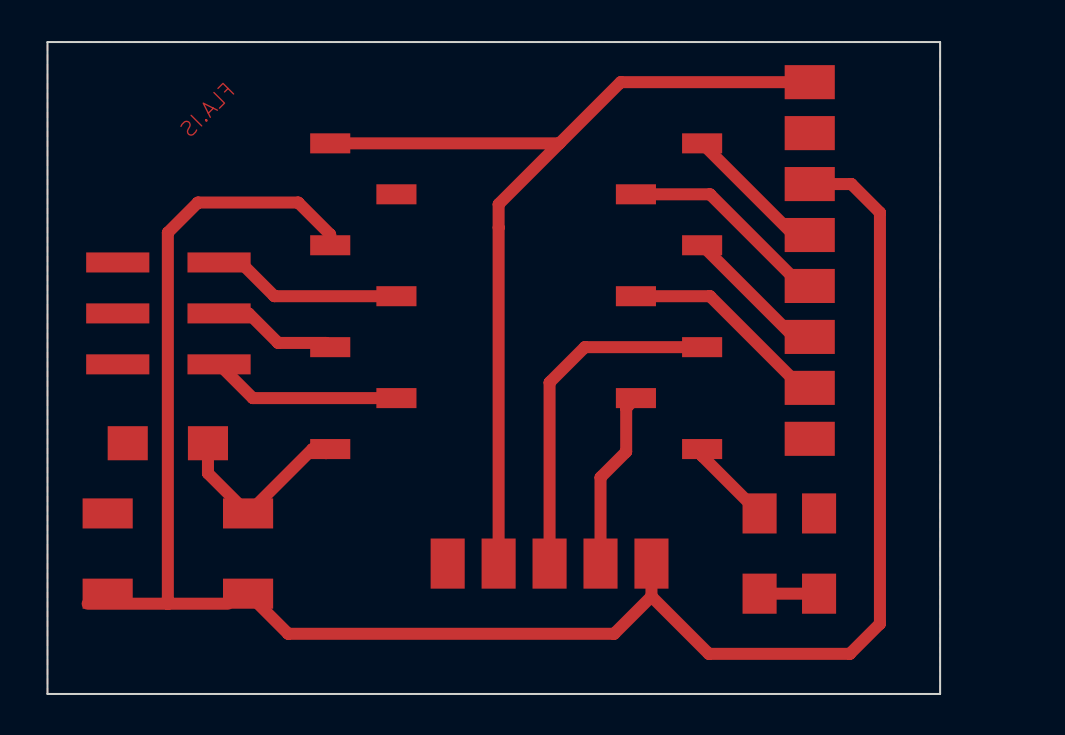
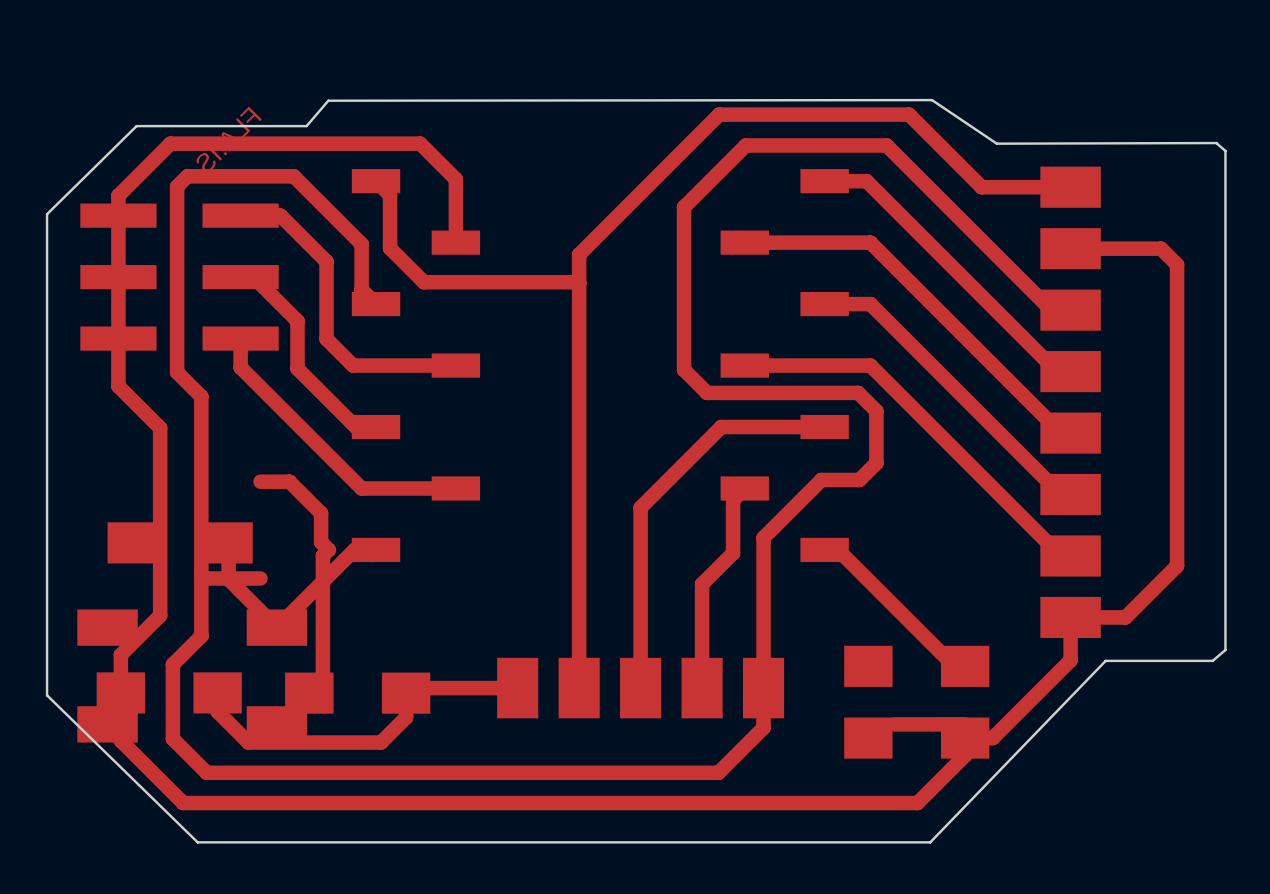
board edge: (940, 42) (47, 42) (47, 693) (940, 693) (940, 42) -> (932, 100) (996, 143) (1216, 143) (1225, 151) (1225, 649) (1212, 660) (1105, 660) (930, 842) (197, 842) (47, 695) (47, 214) (136, 126) (306, 126) (328, 100) (932, 100)
top track: (809, 82) (620, 82) (614, 88) -> (1070, 187) (981, 187) (909, 114) (719, 114)
top track: (559, 143) (330, 143) -> (579, 282) (423, 282) (390, 248) (390, 195) (376, 181)
top track: (702, 143) (793, 235) (809, 235) -> (824, 181) (866, 181) (1057, 371) (1070, 371)
top track: (809, 184) (851, 184) (879, 212) (879, 623) (849, 653) (708, 653) (651, 596) -> none
top track: none -> (455, 242) (455, 179) (420, 143) (170, 143) (118, 195) (118, 386) (160, 427) (160, 615) (120, 654) (120, 740) (183, 803) (917, 803) (965, 755) (965, 738) (992, 738) (1070, 660) (1070, 617) (1125, 617) (1177, 565) (1177, 264) (1161, 248) (1070, 248)
top track: (710, 194) (801, 285) (809, 285) -> (834, 242) (870, 242) (1060, 433) (1070, 433)
top track: (330, 245) (330, 234) (298, 202) (197, 202) (167, 232) (167, 603) -> (376, 304) (361, 289) (361, 244) (293, 176) (187, 176) (177, 186) (177, 372) (201, 396) (201, 635)
top track: (702, 245) (793, 336) (809, 336) -> (824, 304) (870, 304) (1060, 494) (1070, 494)
top track: none -> (1070, 310) (1051, 310) (886, 145) (745, 145) (684, 207) (684, 369) (707, 392) (858, 392) (876, 411) (876, 463) (859, 480) (821, 480) (763, 537) (763, 688)
part position: (809, 260) -> (1070, 402)
top track: (219, 262) (240, 262) (274, 296) (311, 296) -> (240, 215) (280, 215) (326, 261) (326, 339) (353, 365)
top track: (710, 296) (801, 387) (809, 387) -> (834, 365) (870, 365) (1060, 555) (1070, 555)
part position: (168, 313) -> (179, 277)
top track: (219, 313) (248, 313) (278, 342) (326, 342) (330, 347) -> (240, 277) (253, 277) (297, 321) (297, 368) (355, 427) (376, 427)
top track: (616, 347) (584, 347) (549, 382) (549, 414) -> (721, 427) (640, 507)
top track: (219, 364) (252, 398) (318, 398) -> (240, 338) (240, 367) (361, 488)
top track: none -> (260, 481) (289, 481) (321, 513) (321, 542) (328, 549) (322, 555) (322, 679) (309, 693)
top track: (702, 449) (702, 455) (759, 513) -> (824, 549) (838, 549) (954, 666) (965, 666)
top track: none -> (201, 575) (204, 578) (260, 578)
part: none -> (916, 666)
part: (759, 553) -> none
part: (819, 553) -> none
top track: none -> (517, 688) (411, 688) (406, 693) (406, 717) (380, 742) (248, 742) (217, 711) (217, 692)
part: none -> (169, 692)
part: none -> (357, 693)
top track: (248, 593) (288, 633) -> (201, 635) (172, 664) (172, 738) (206, 772) (325, 772)
top track: (228, 603) (87, 603) -> none
part: none -> (916, 738)

